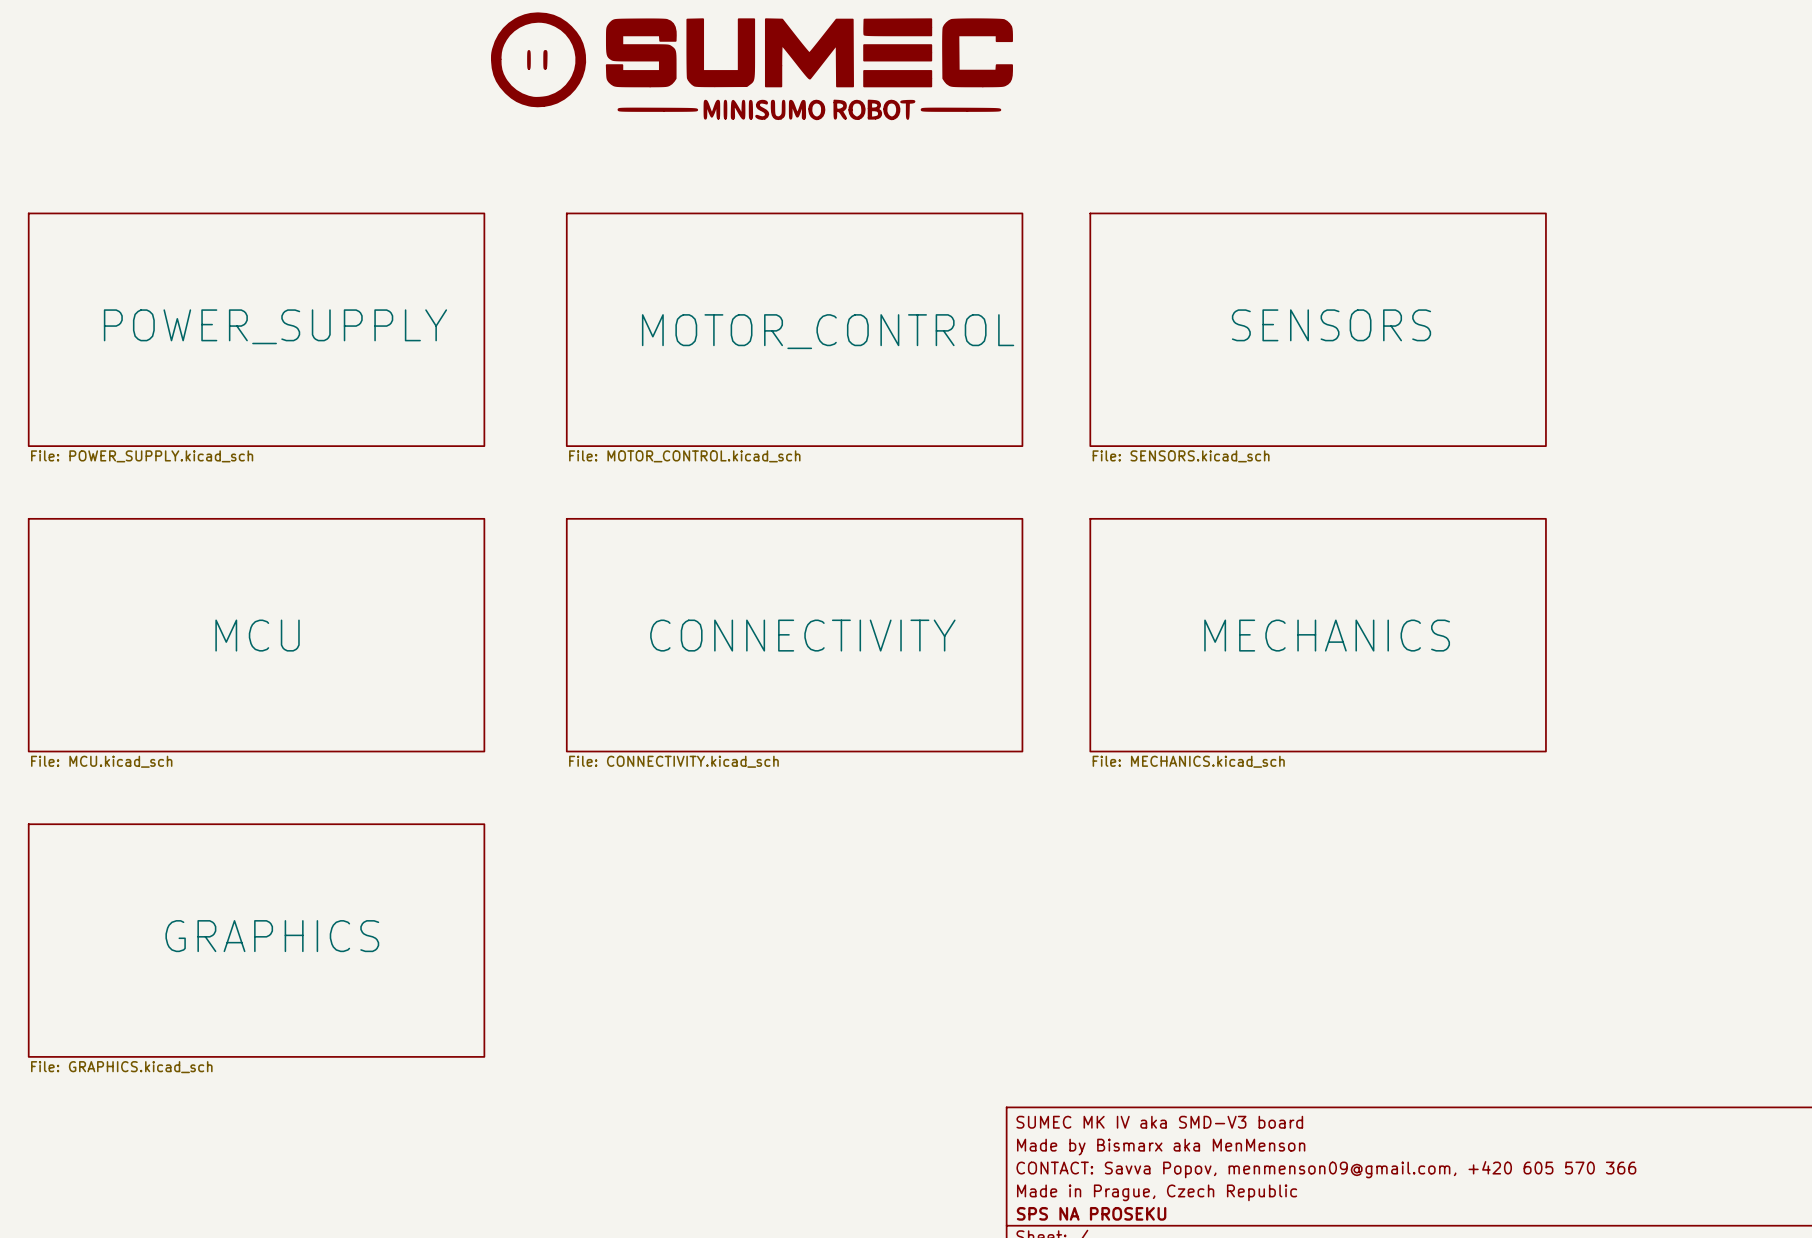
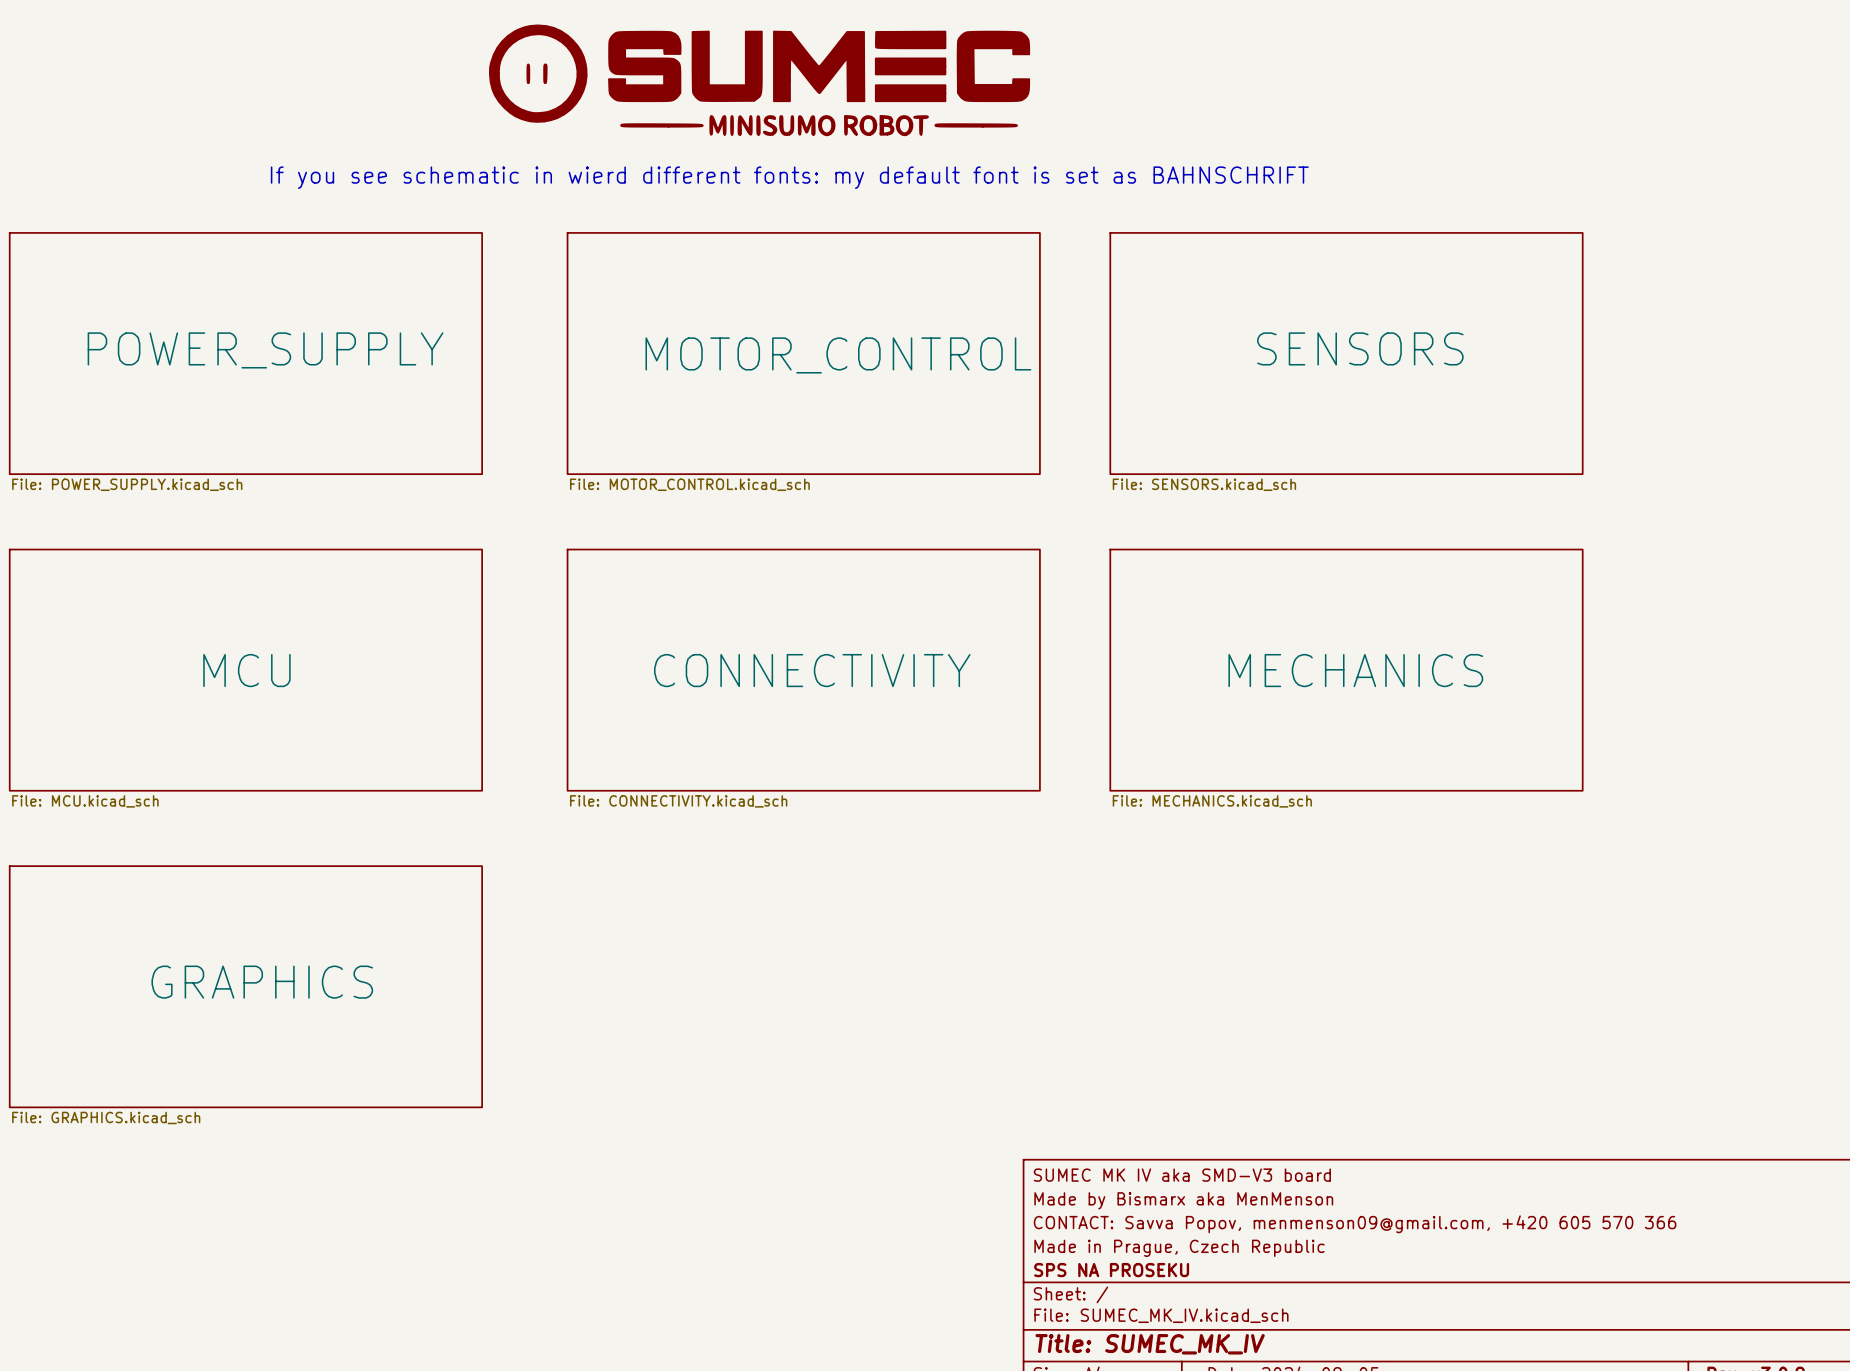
text: none -> If you see schematic in wierd different fonts: my default font is set as BAHNSCHRIFT (789, 177)

